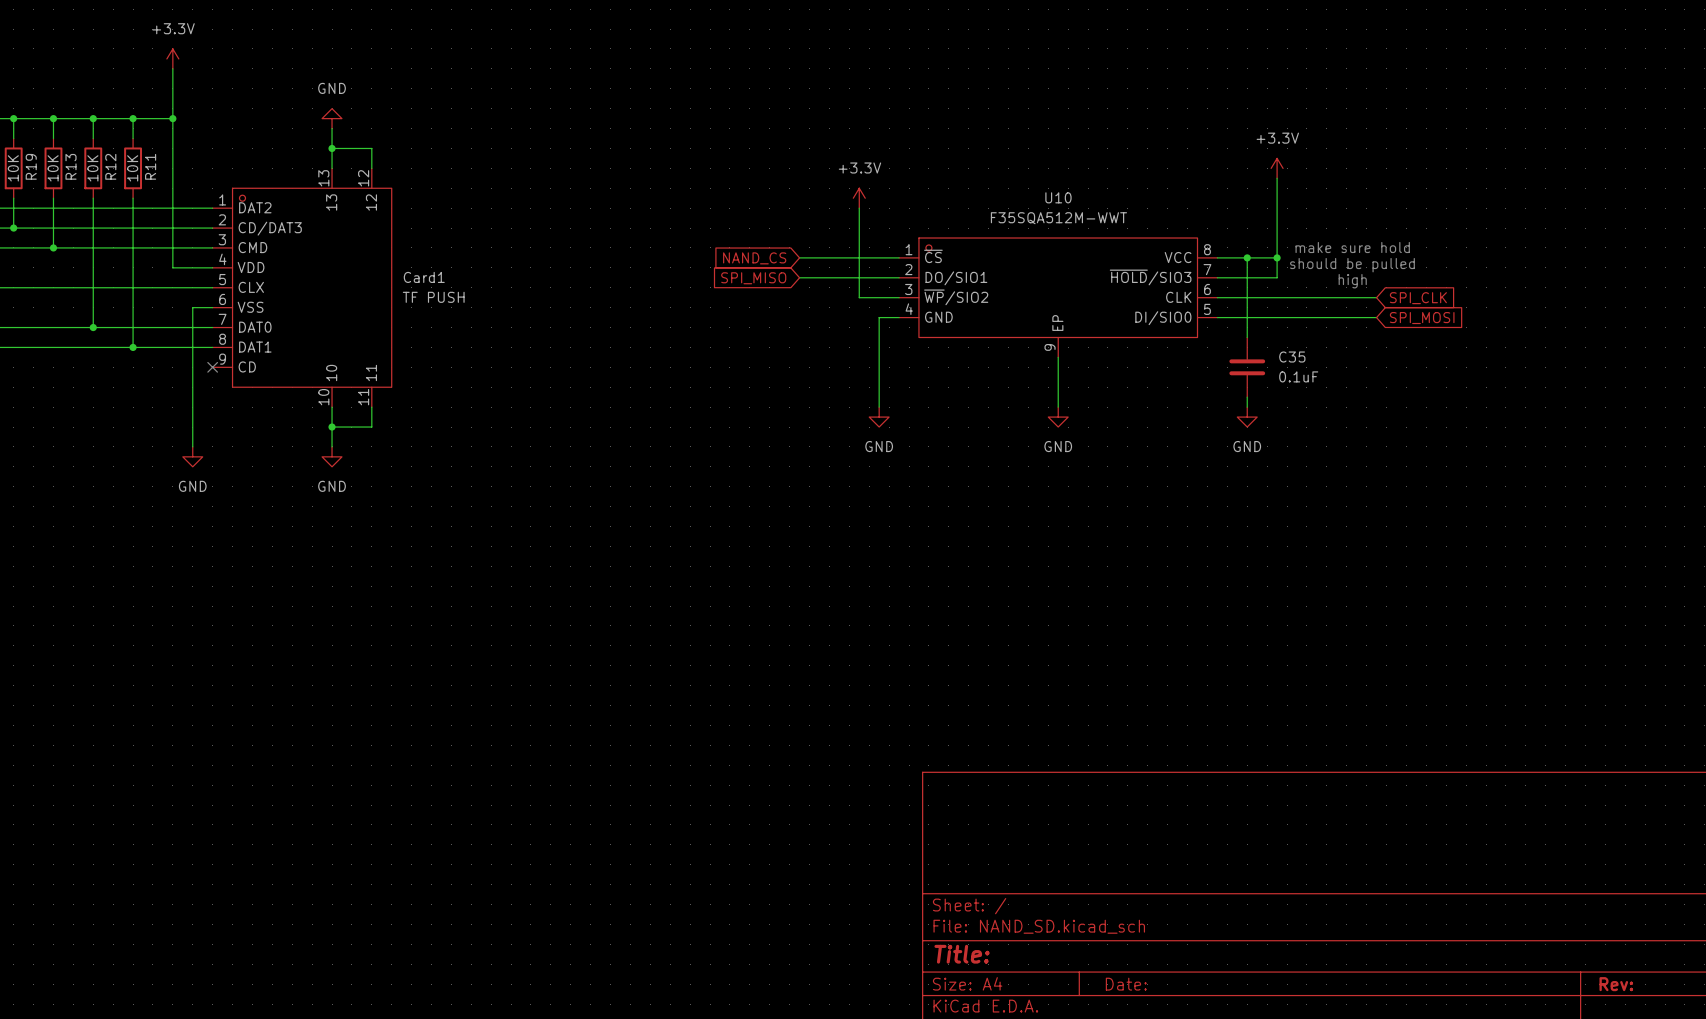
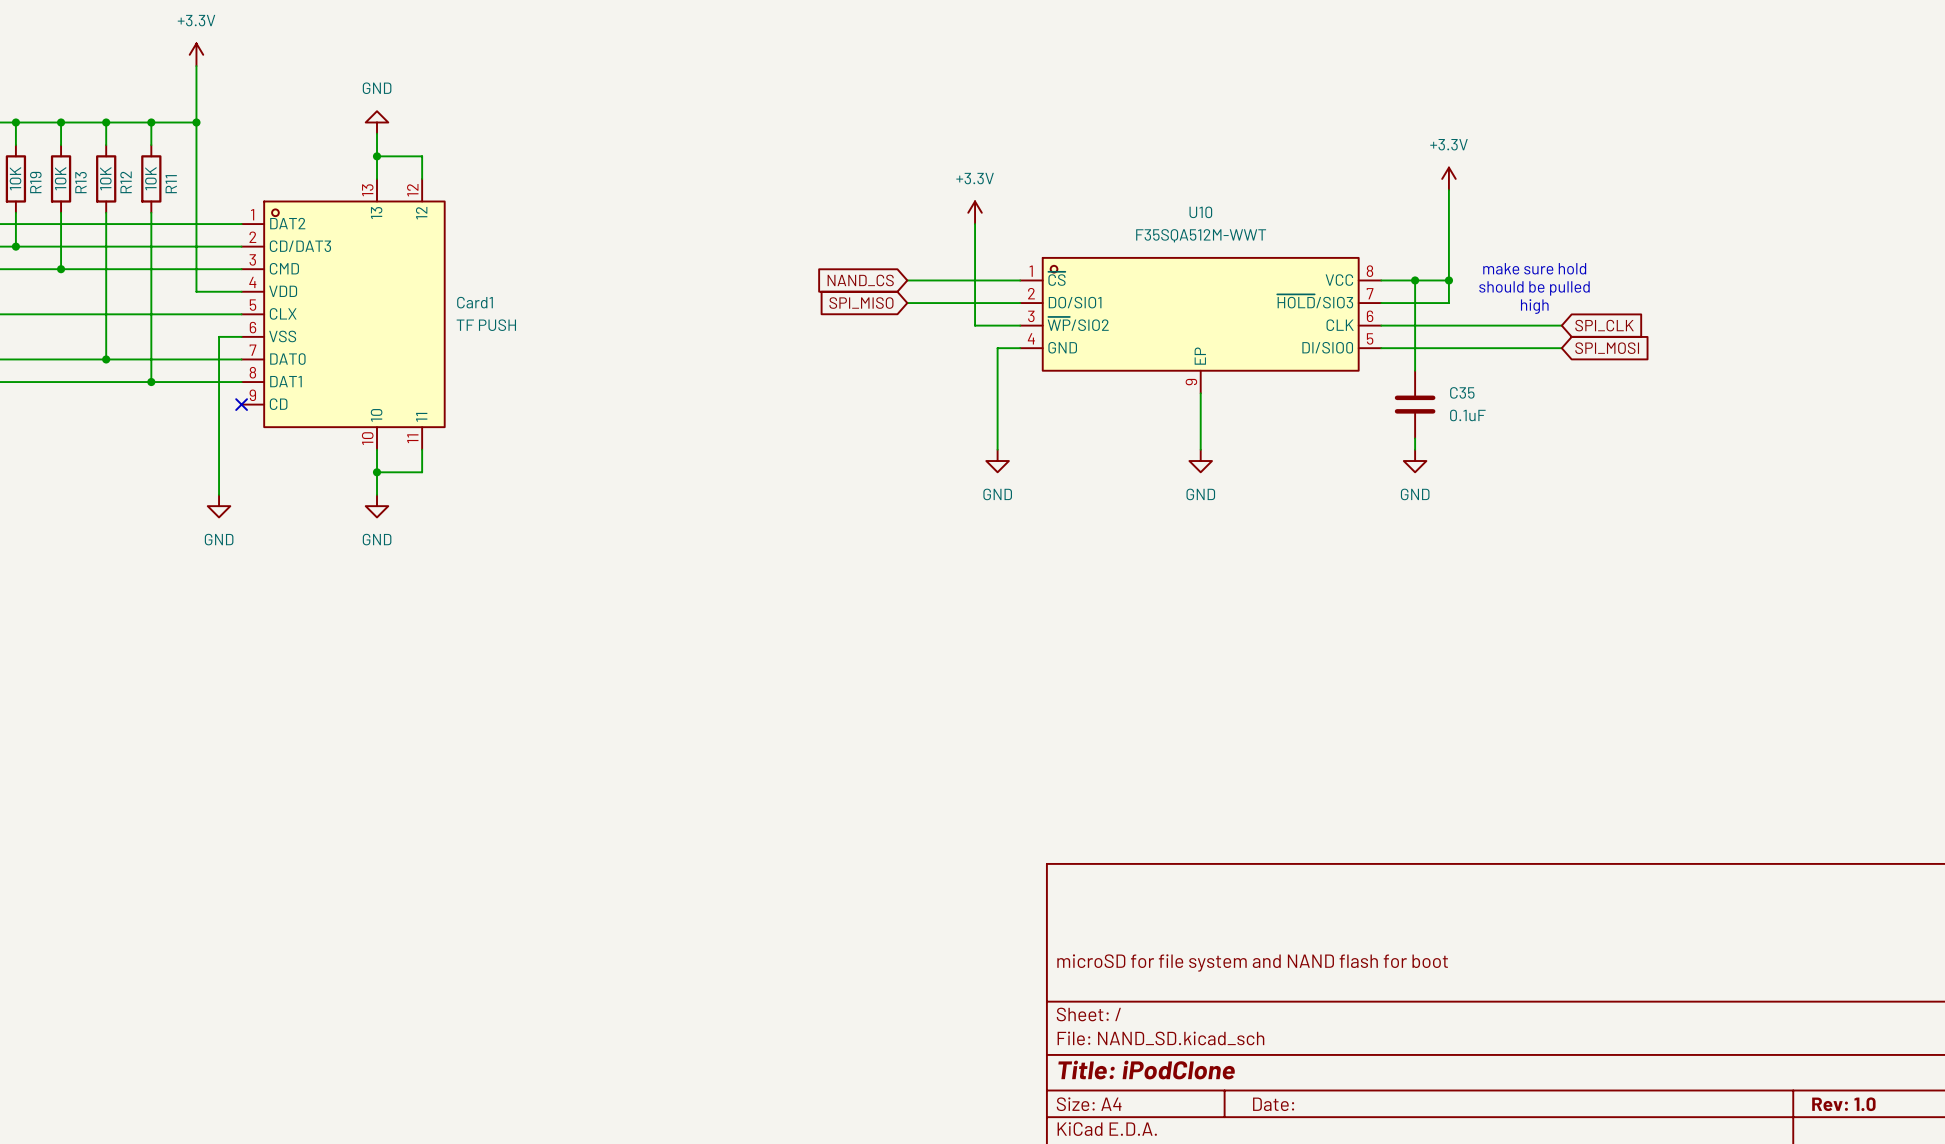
title block: none -> microSD for file system and NAND flash for boot (1252, 962)
title block: Title: (962, 954) -> Title: iPodClone (1146, 1070)
title block: Rev: (1616, 984) -> Rev: 1.0 (1843, 1104)

